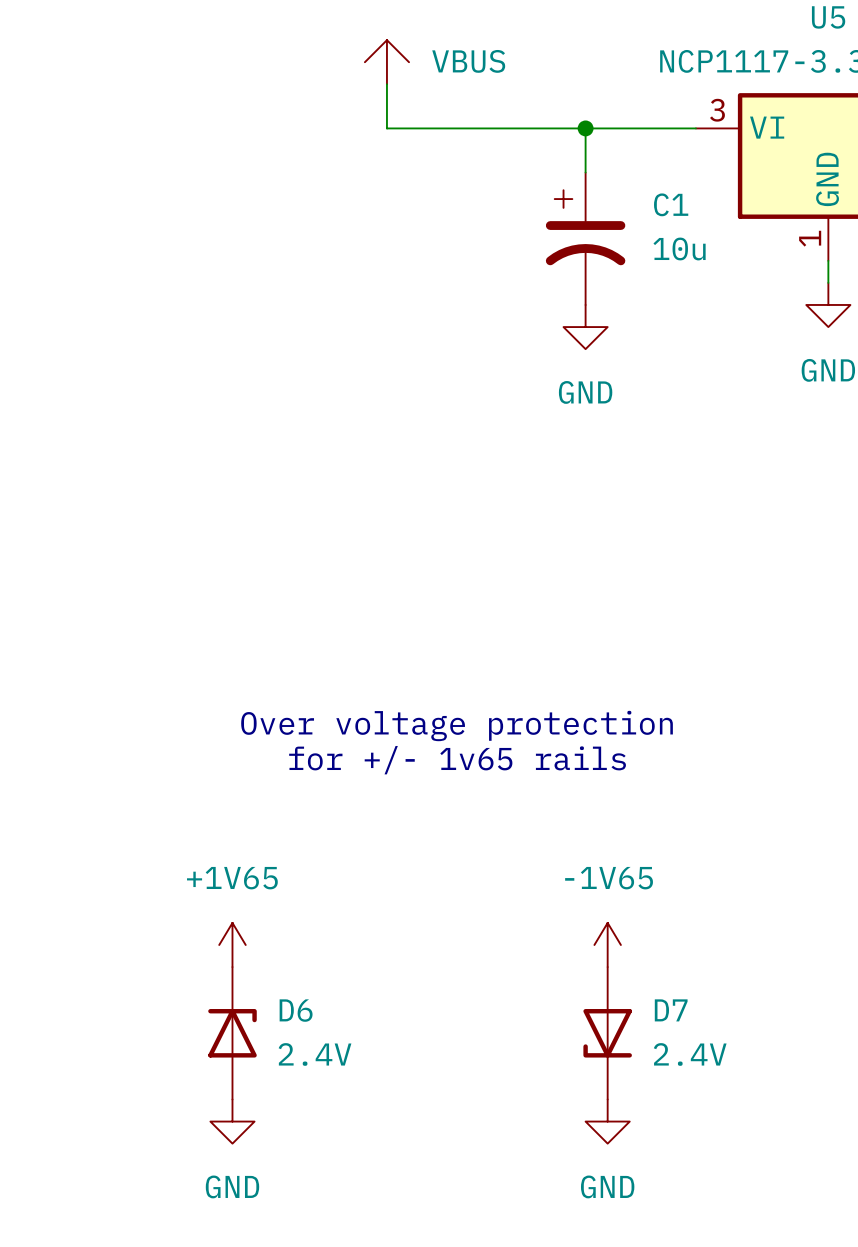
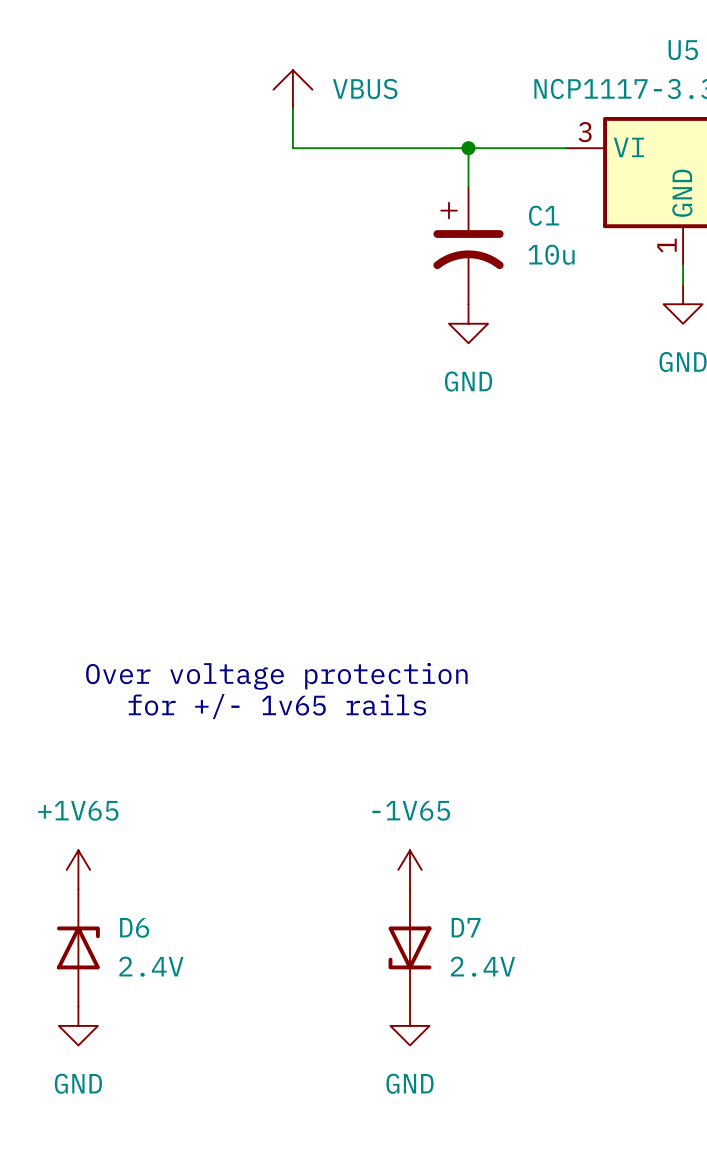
text position: Over voltage protection (457, 726) -> Over voltage protection (276, 676)
text position: for +/- 1v65 rails (457, 760) -> for +/- 1v65 rails (277, 706)
power symbol position: +1V65 (232, 945) -> +1V65 (78, 869)
power symbol position: -1V65 (607, 945) -> -1V65 (410, 869)
D6 position: (232, 1033) -> (78, 947)
D7 position: (607, 1033) -> (410, 947)
power symbol position: GND (232, 1121) -> GND (78, 1025)
power symbol position: GND (607, 1121) -> GND (410, 1025)

